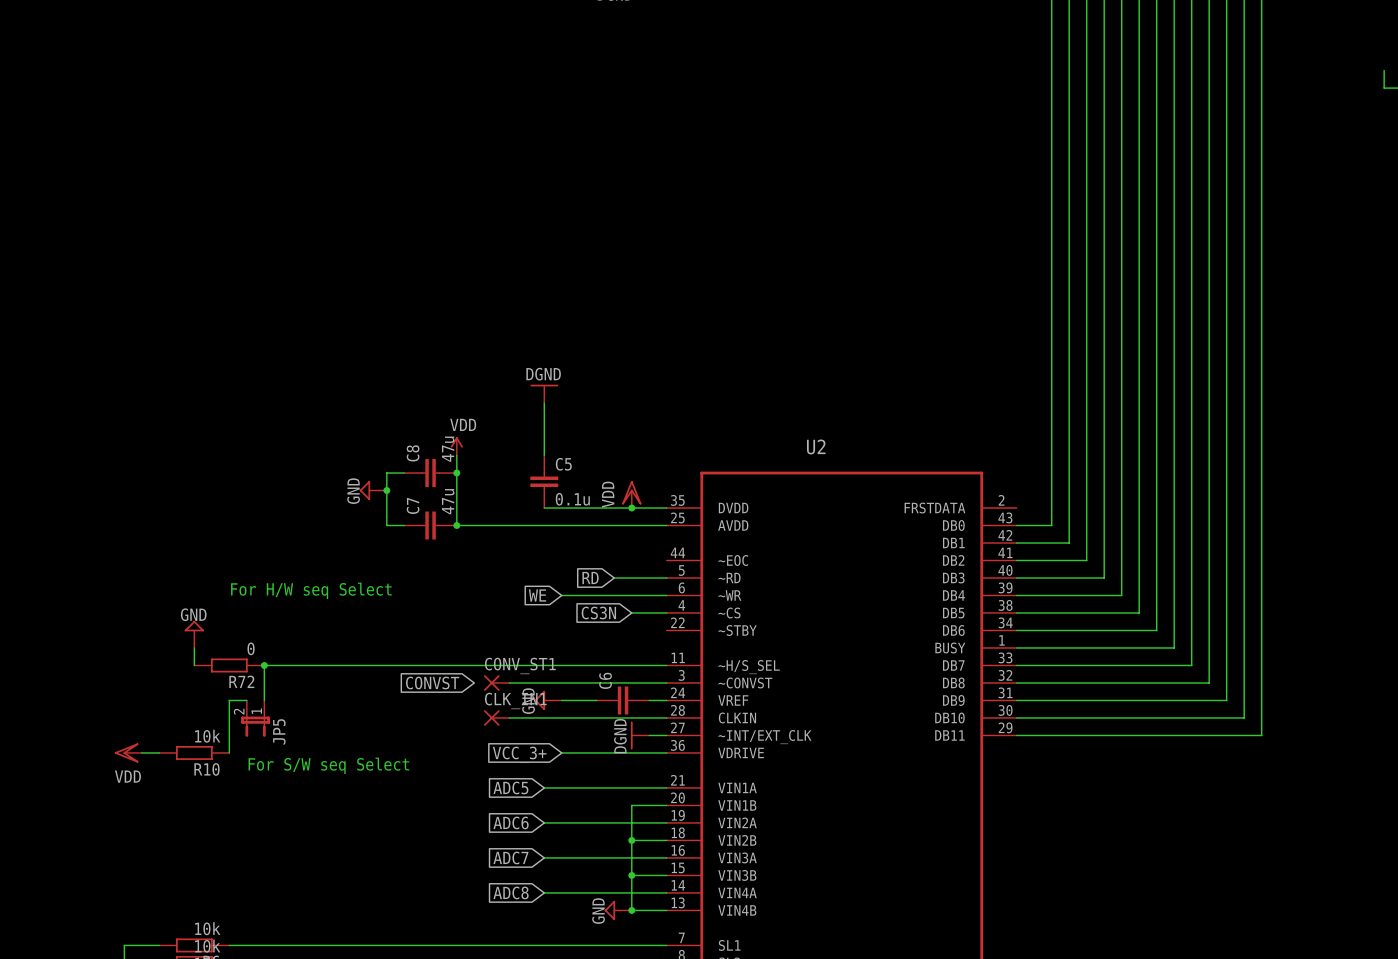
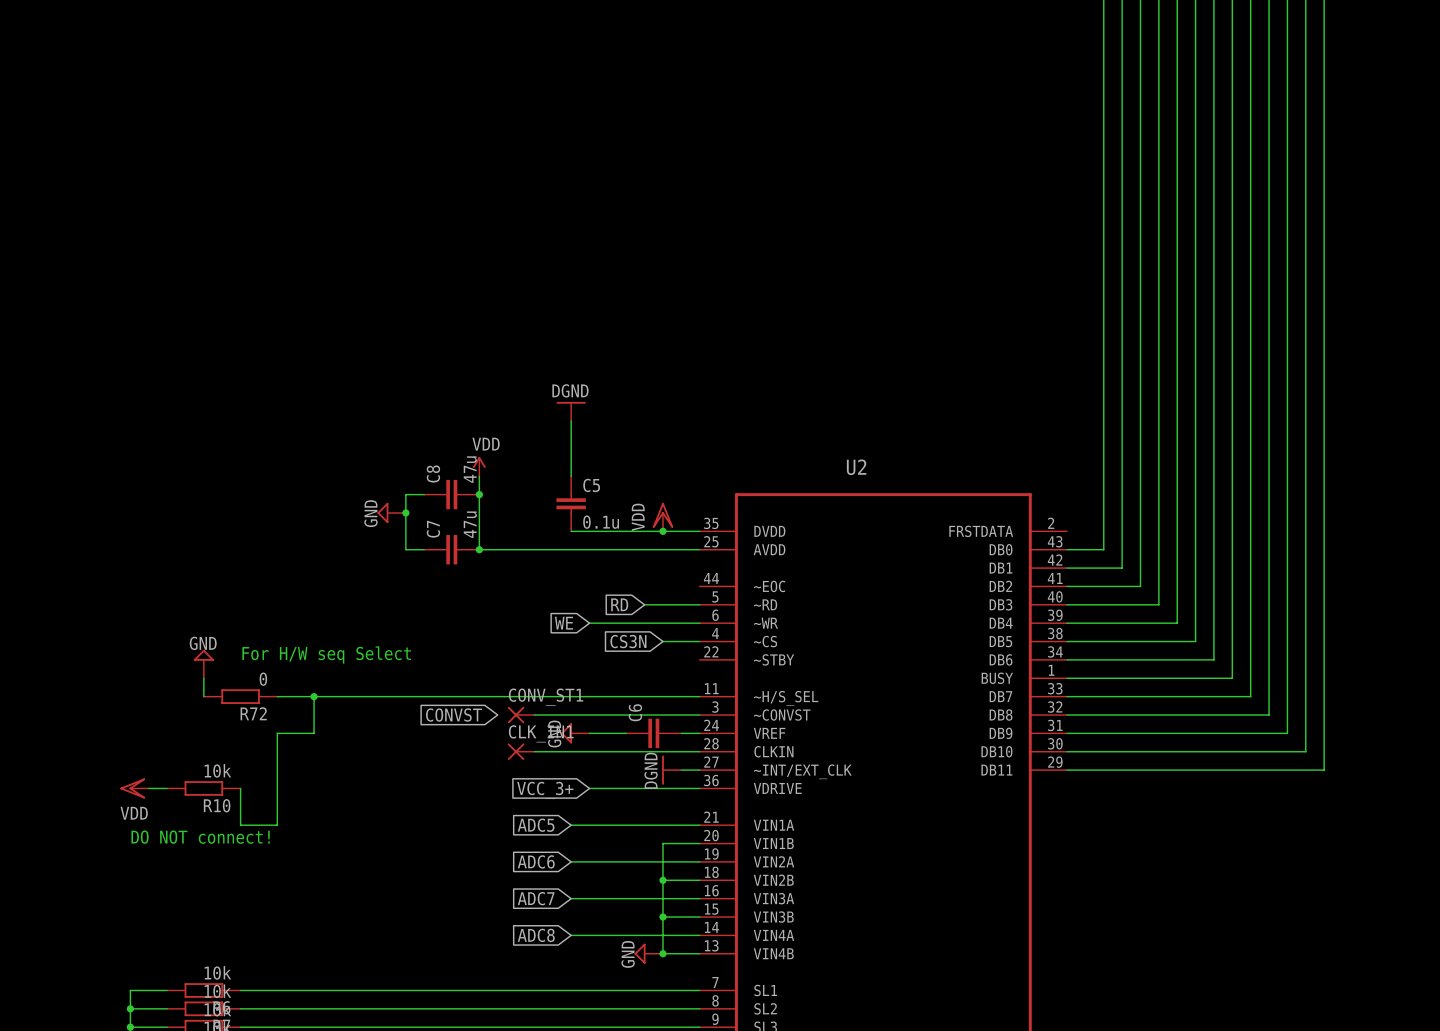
text position: For H/W seq Select (311, 590) -> For H/W seq Select (326, 655)
wire: (264, 665) (264, 700) -> none
junction position: (264, 665) -> (314, 696)
wire: (246, 700) (229, 700) (229, 752) -> (314, 696) (314, 733) (277, 733) (277, 825) (240, 825) (240, 788)
JP5: (255, 718) -> none
text: For S/W seq Select (328, 765) -> none
text: none -> DO NOT connect! (200, 837)

